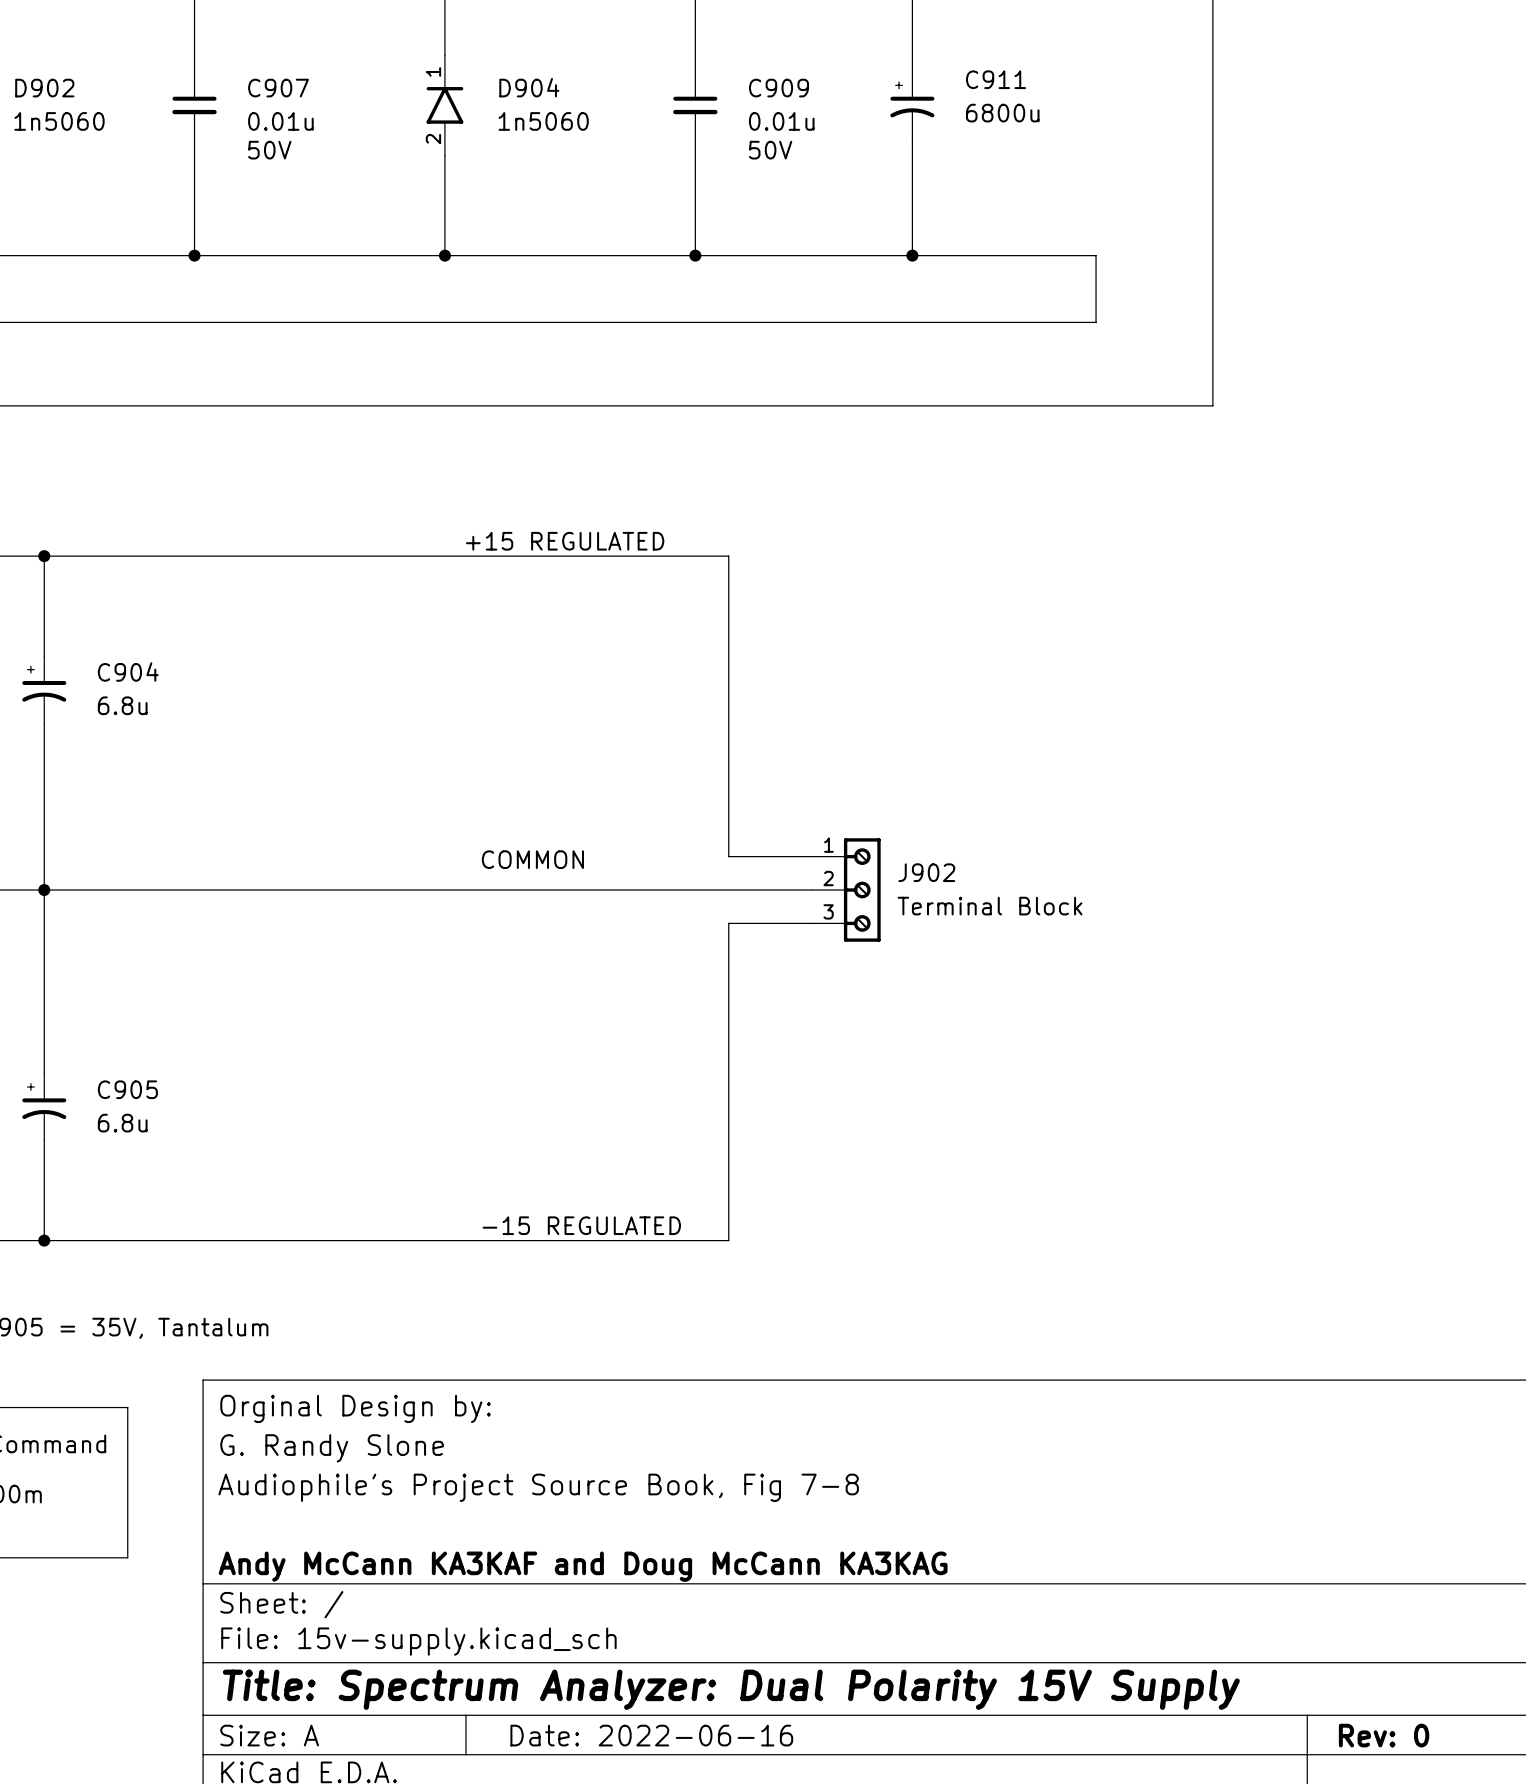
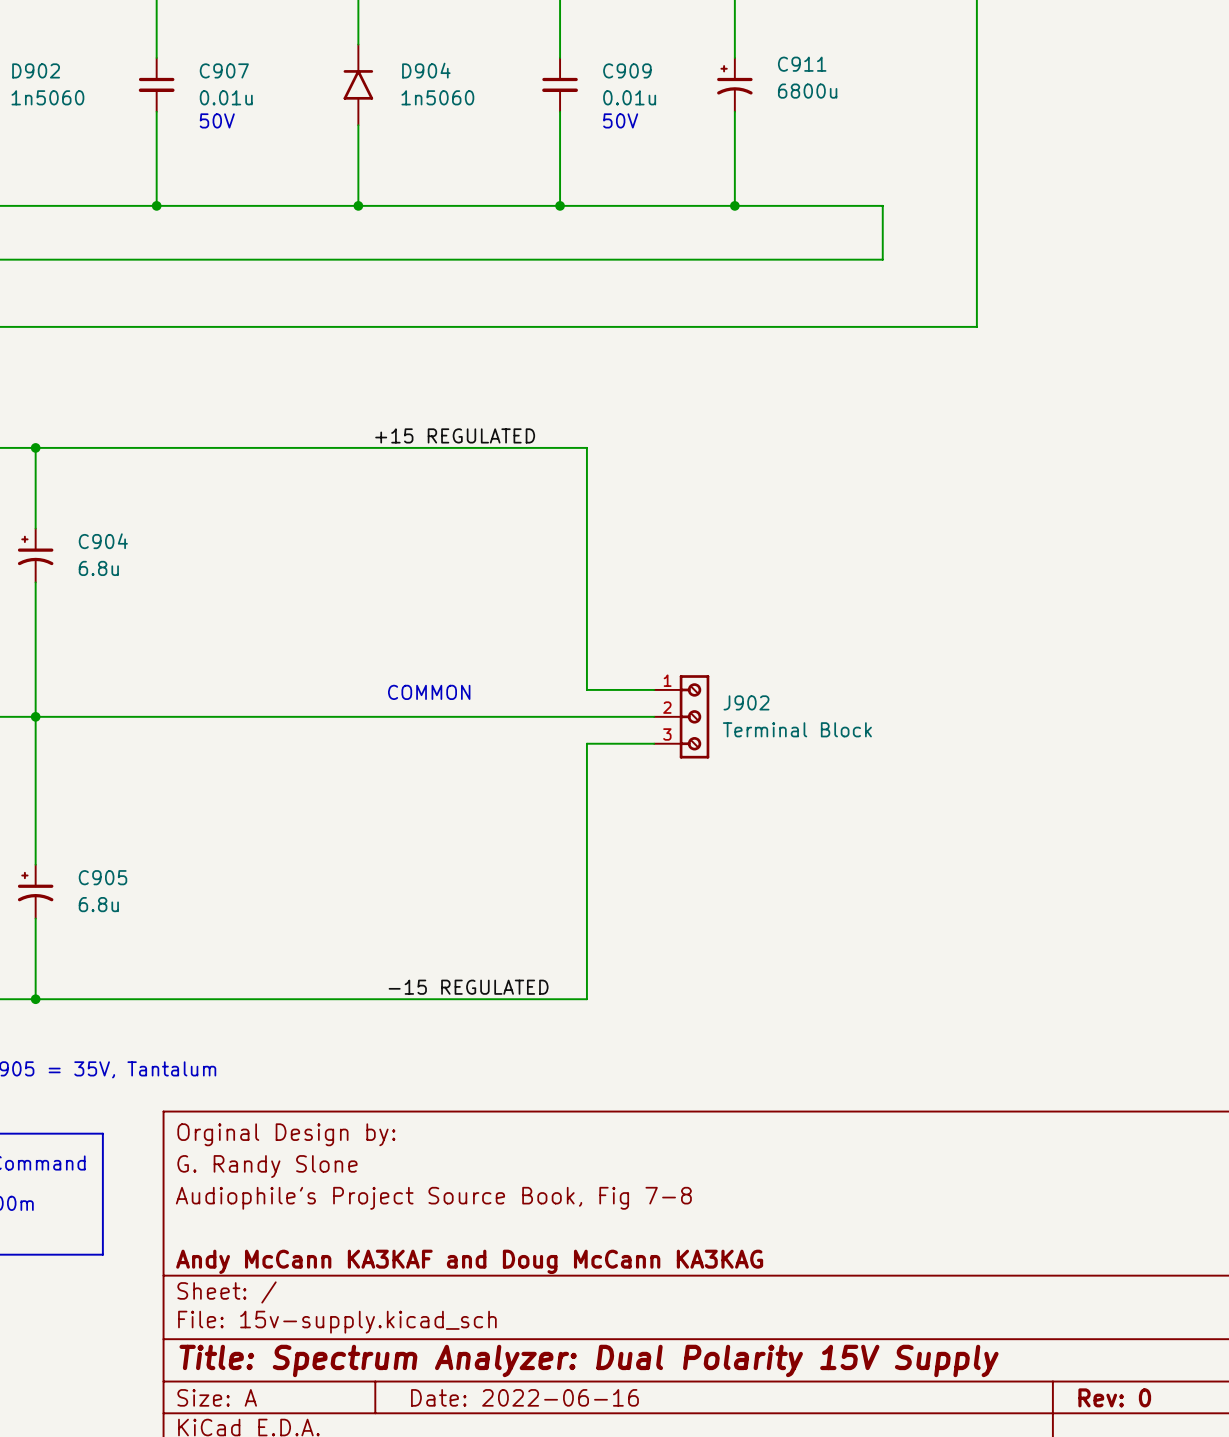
D904 pin number: 1 (433, 71) -> none
D904 pin number: 2 (433, 139) -> none

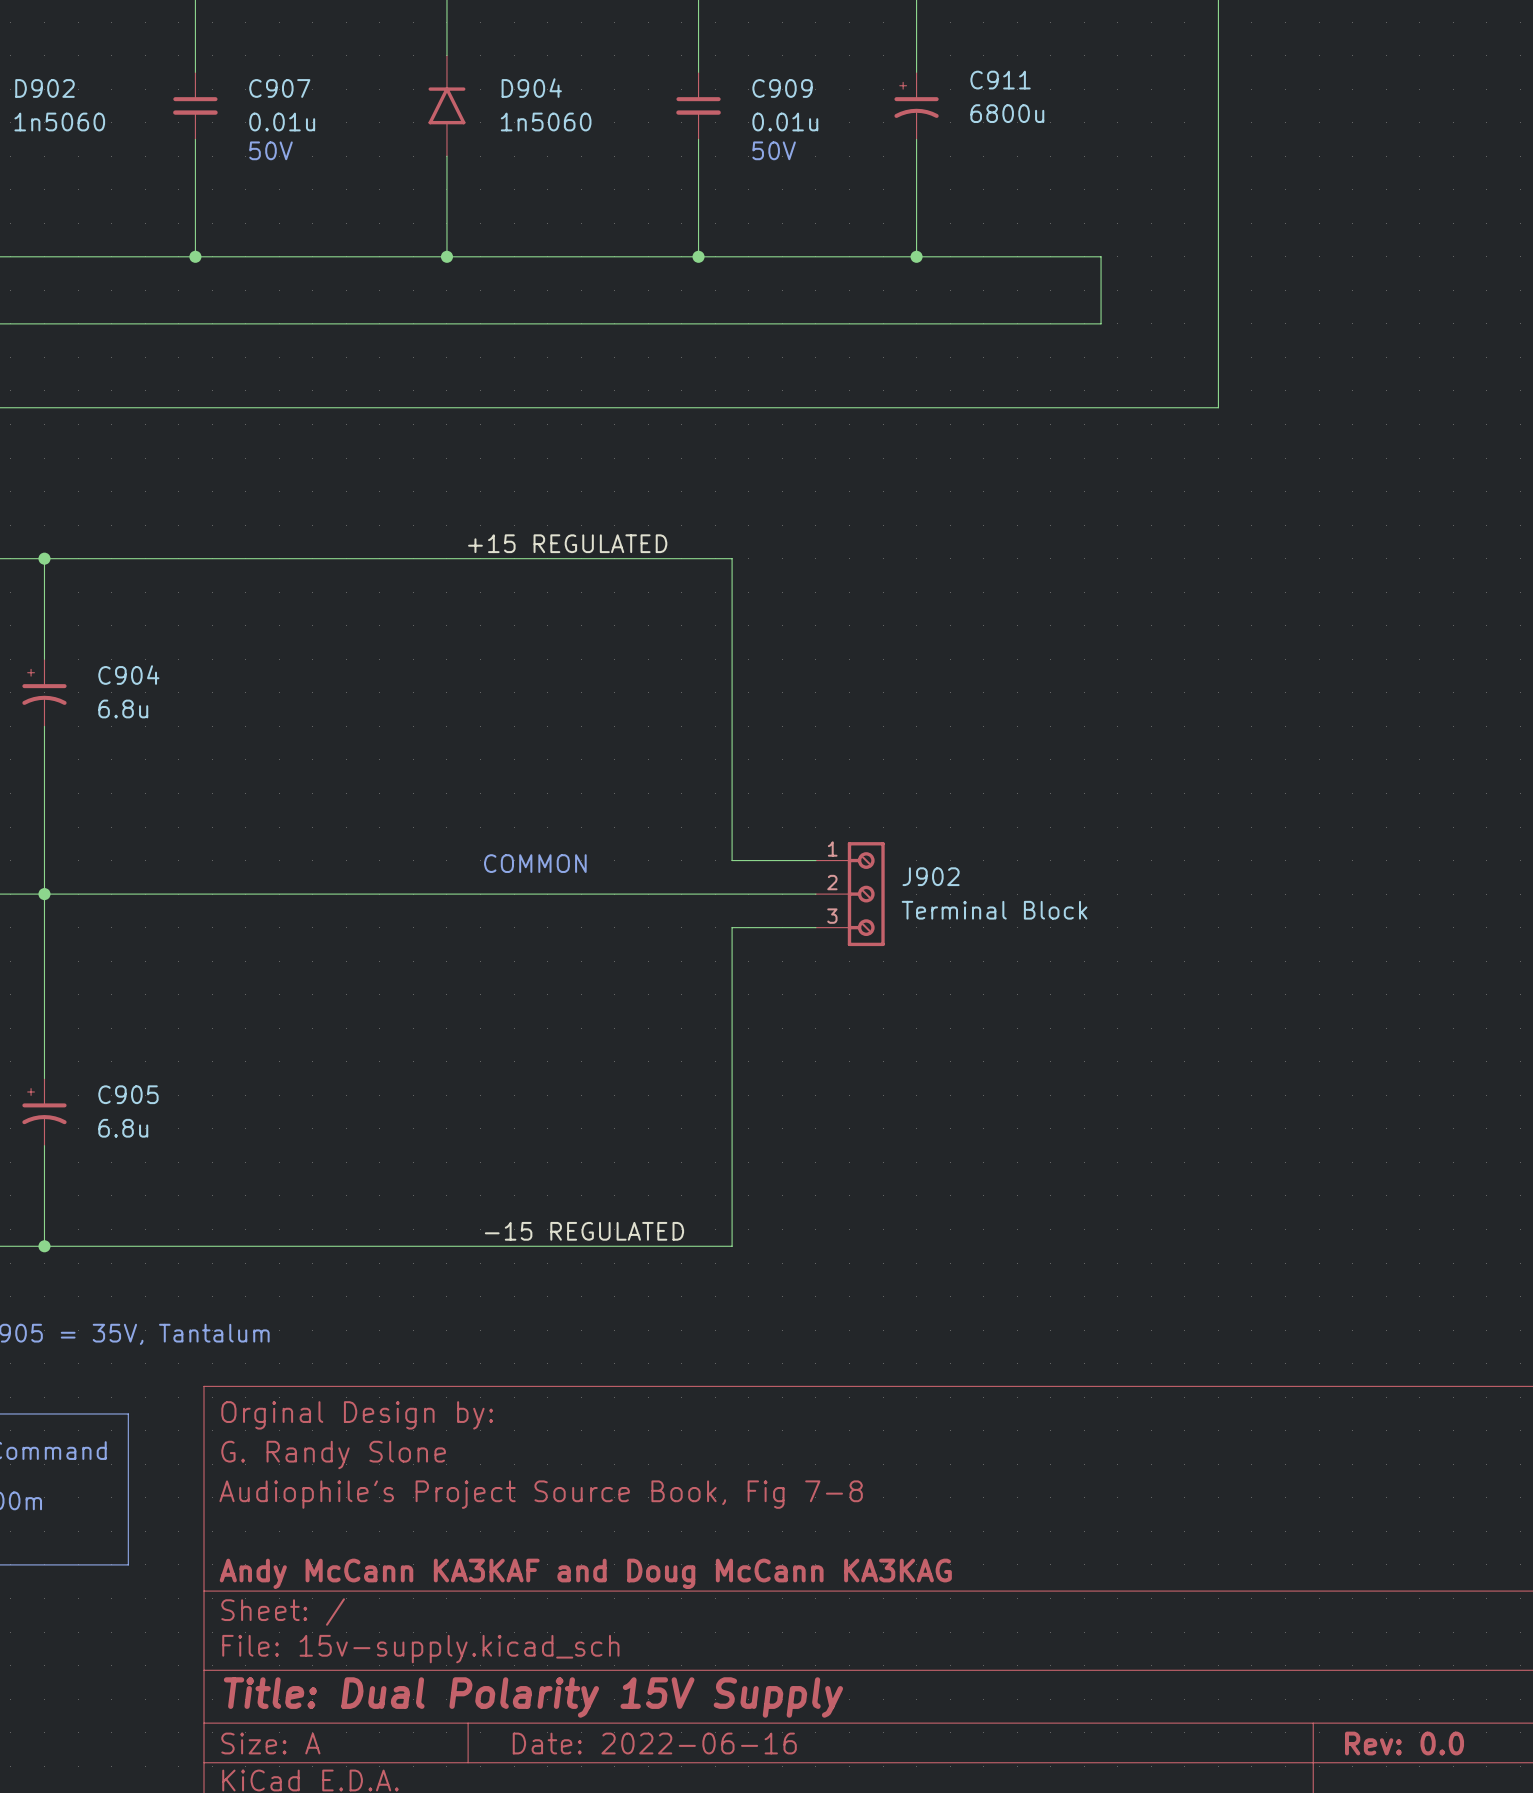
title block: Title: Spectrum Analyzer: Dual Polarity 15V Supply (589, 1360) -> Title: Dual Polarity 15V Supply (533, 1697)
title block: Rev: 0 (1114, 1397) -> Rev: 0.0 (1404, 1743)

